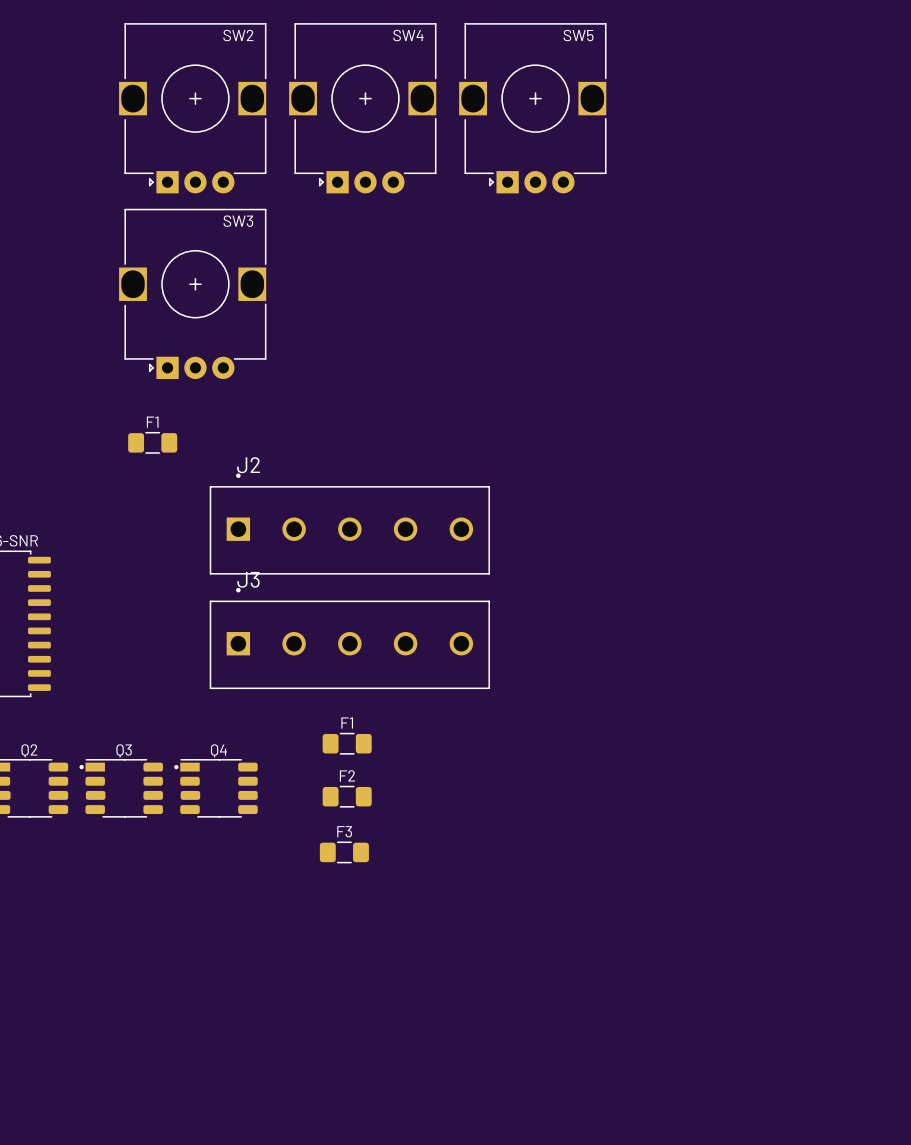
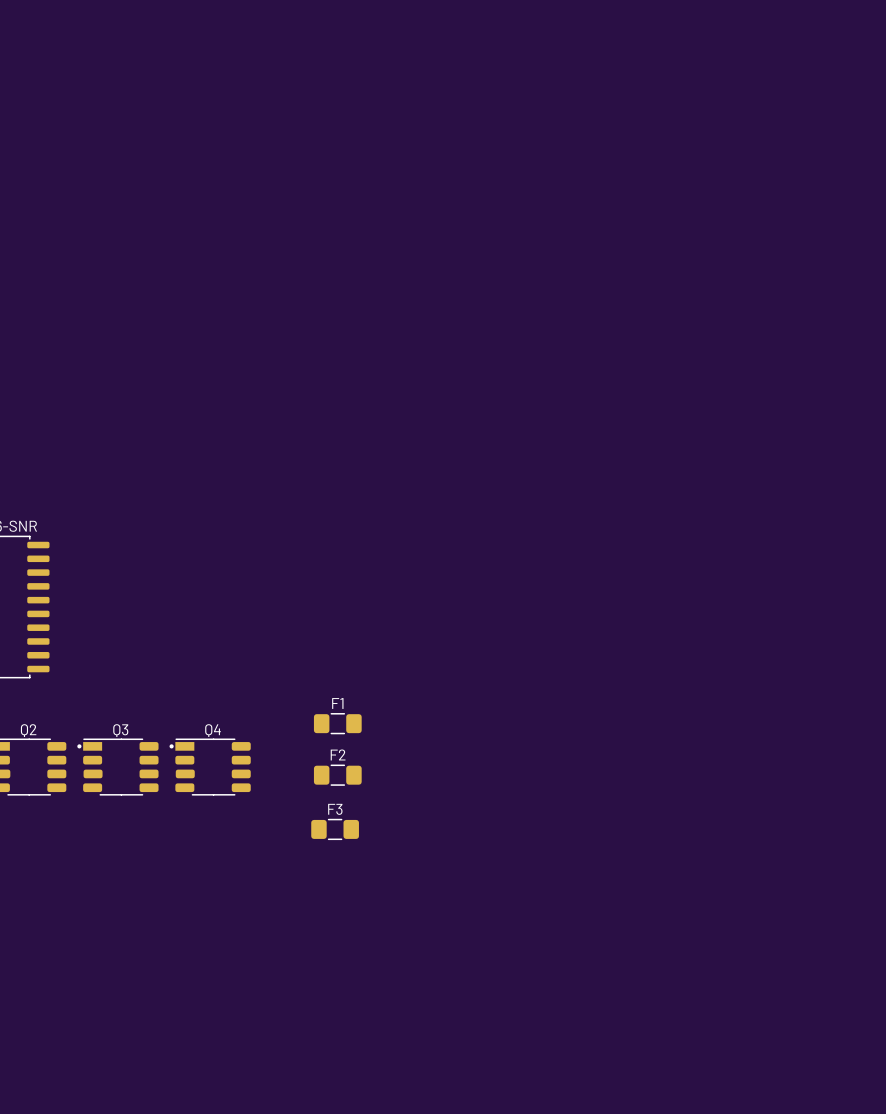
SW2: (192, 108) -> none
SW4: (362, 108) -> none
SW5: (532, 108) -> none
SW3: (192, 293) -> none
F1: (152, 442) -> none
J2: (349, 523) -> none
J3: (349, 638) -> none

